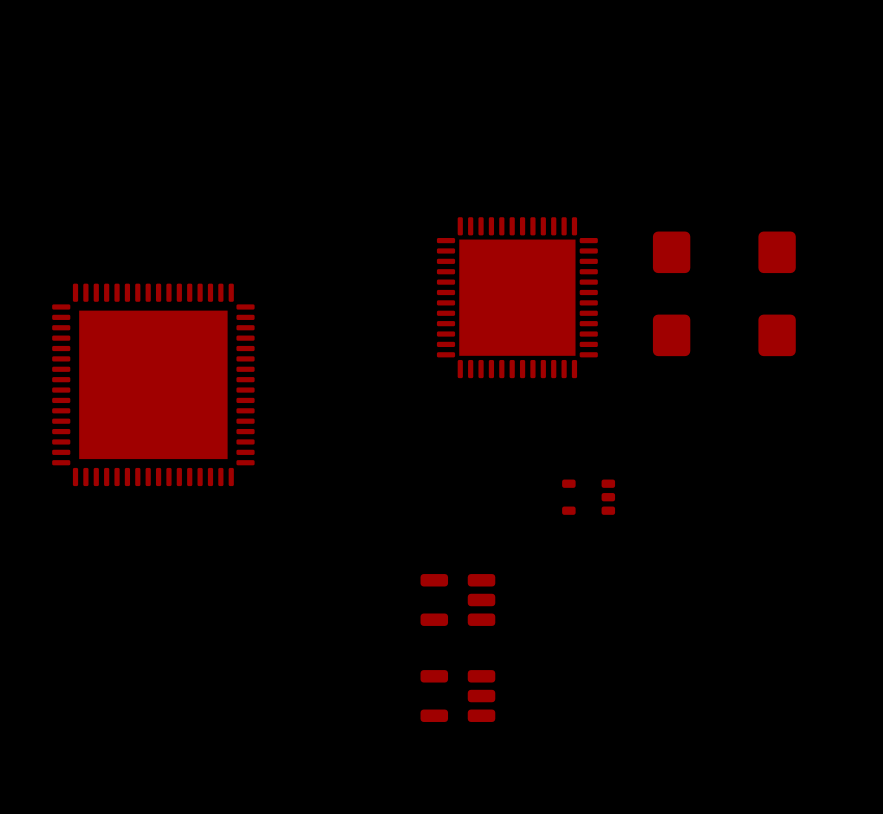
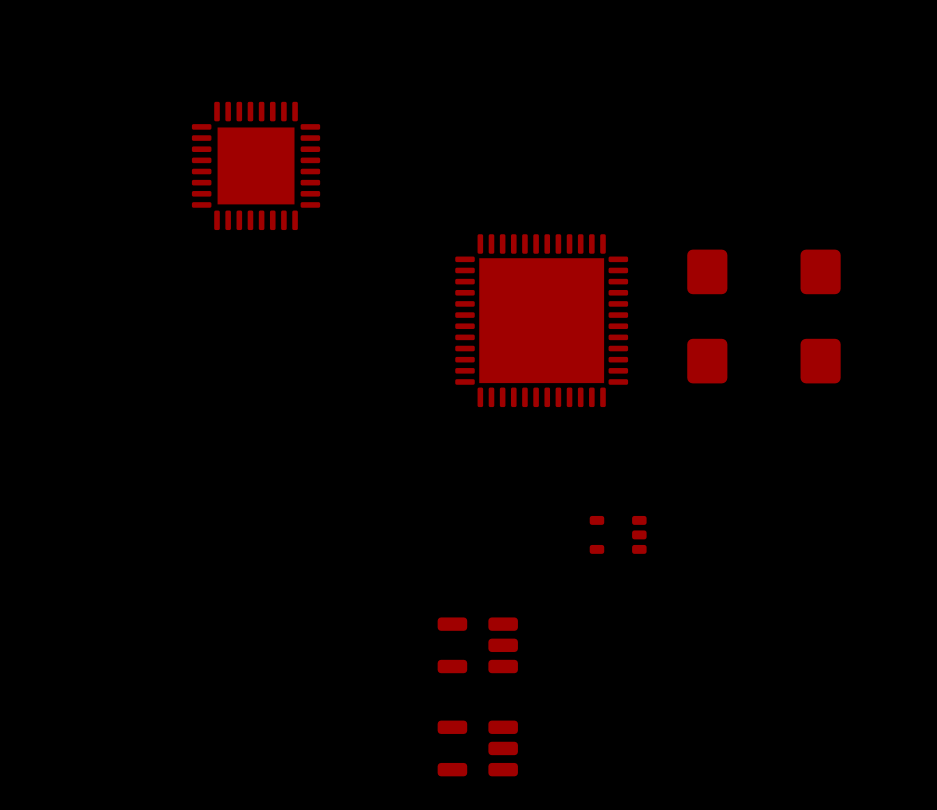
part: none -> (256, 165)
part: (153, 384) -> none

